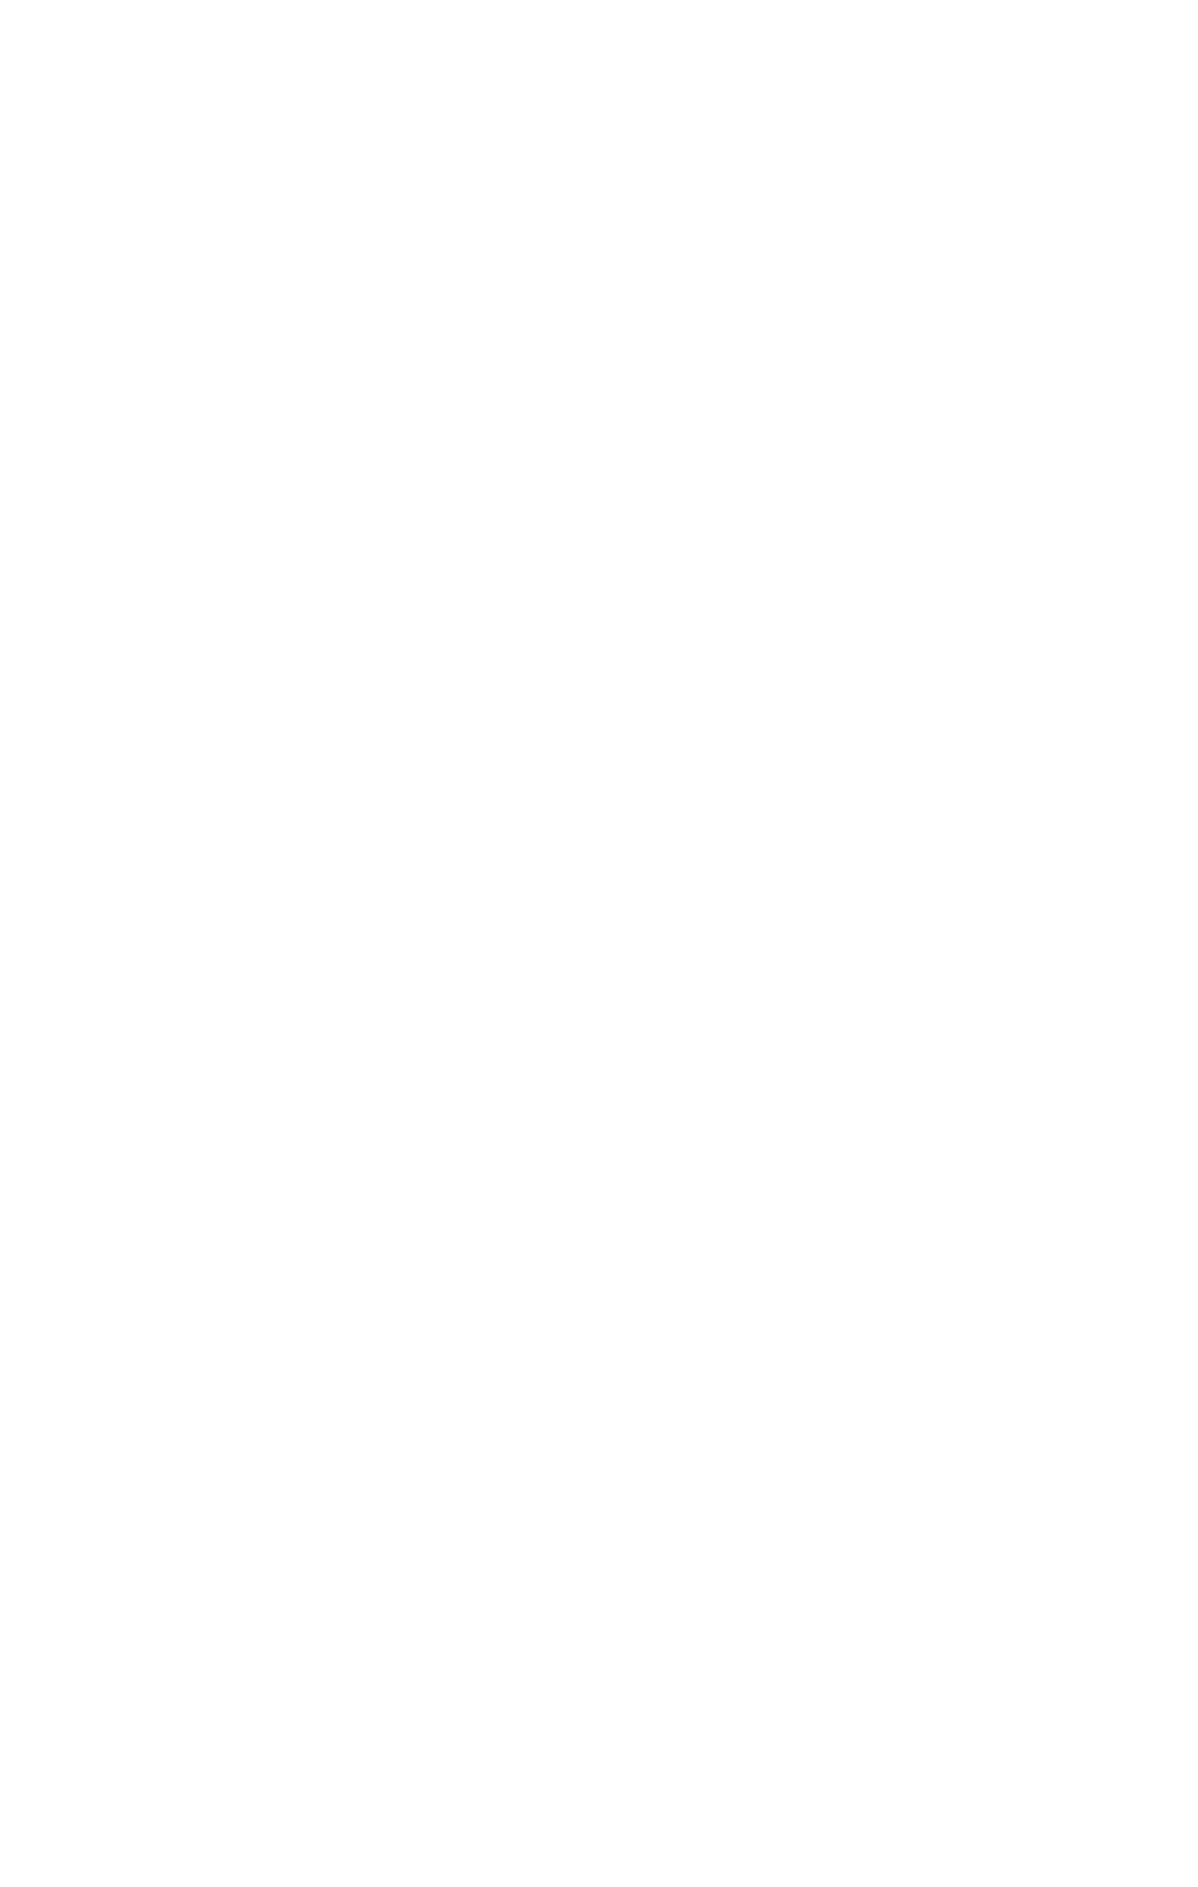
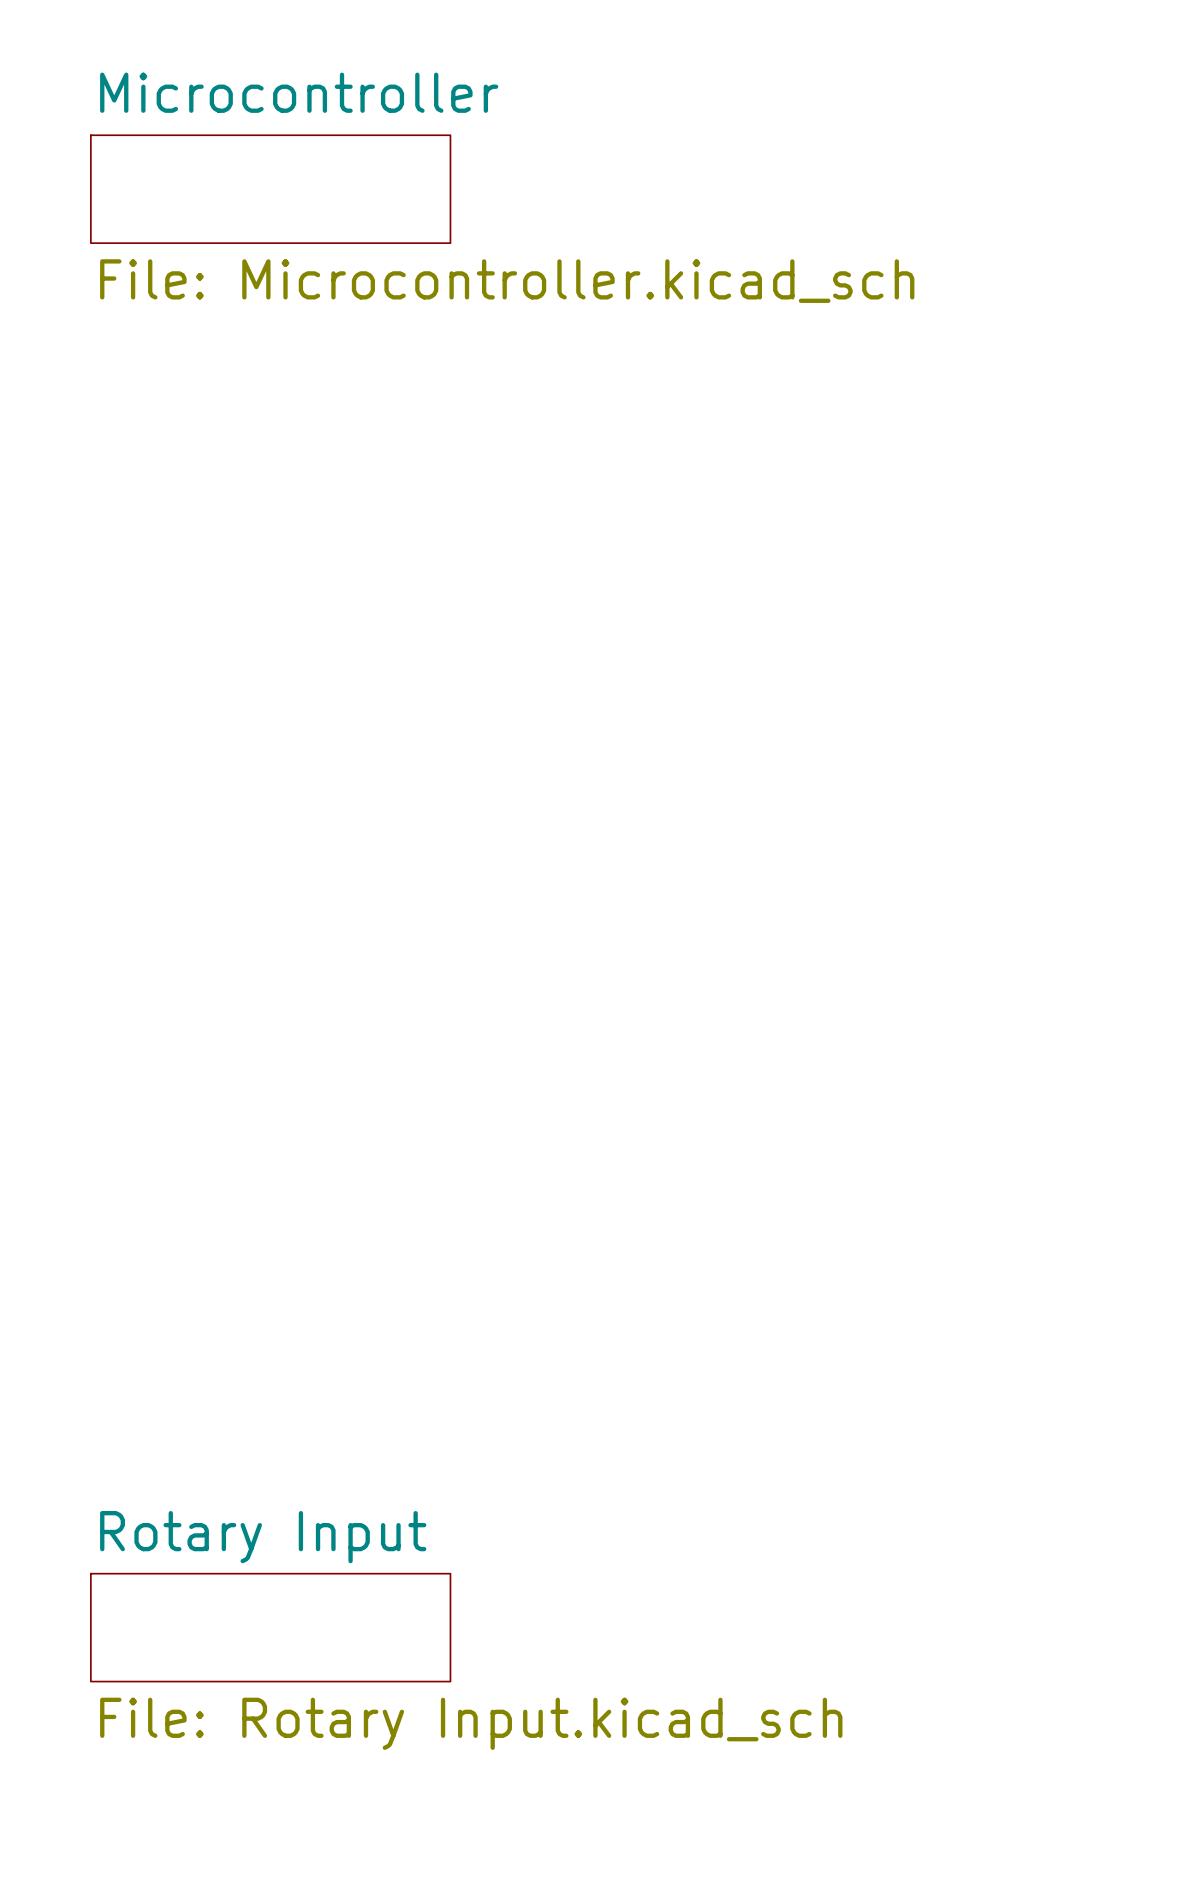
sheet Microcontroller: none -> File: Microcontroller.kicad_sch (270, 189)
sheet Rotary Input: none -> File: Rotary Input.kicad_sch (270, 1627)

